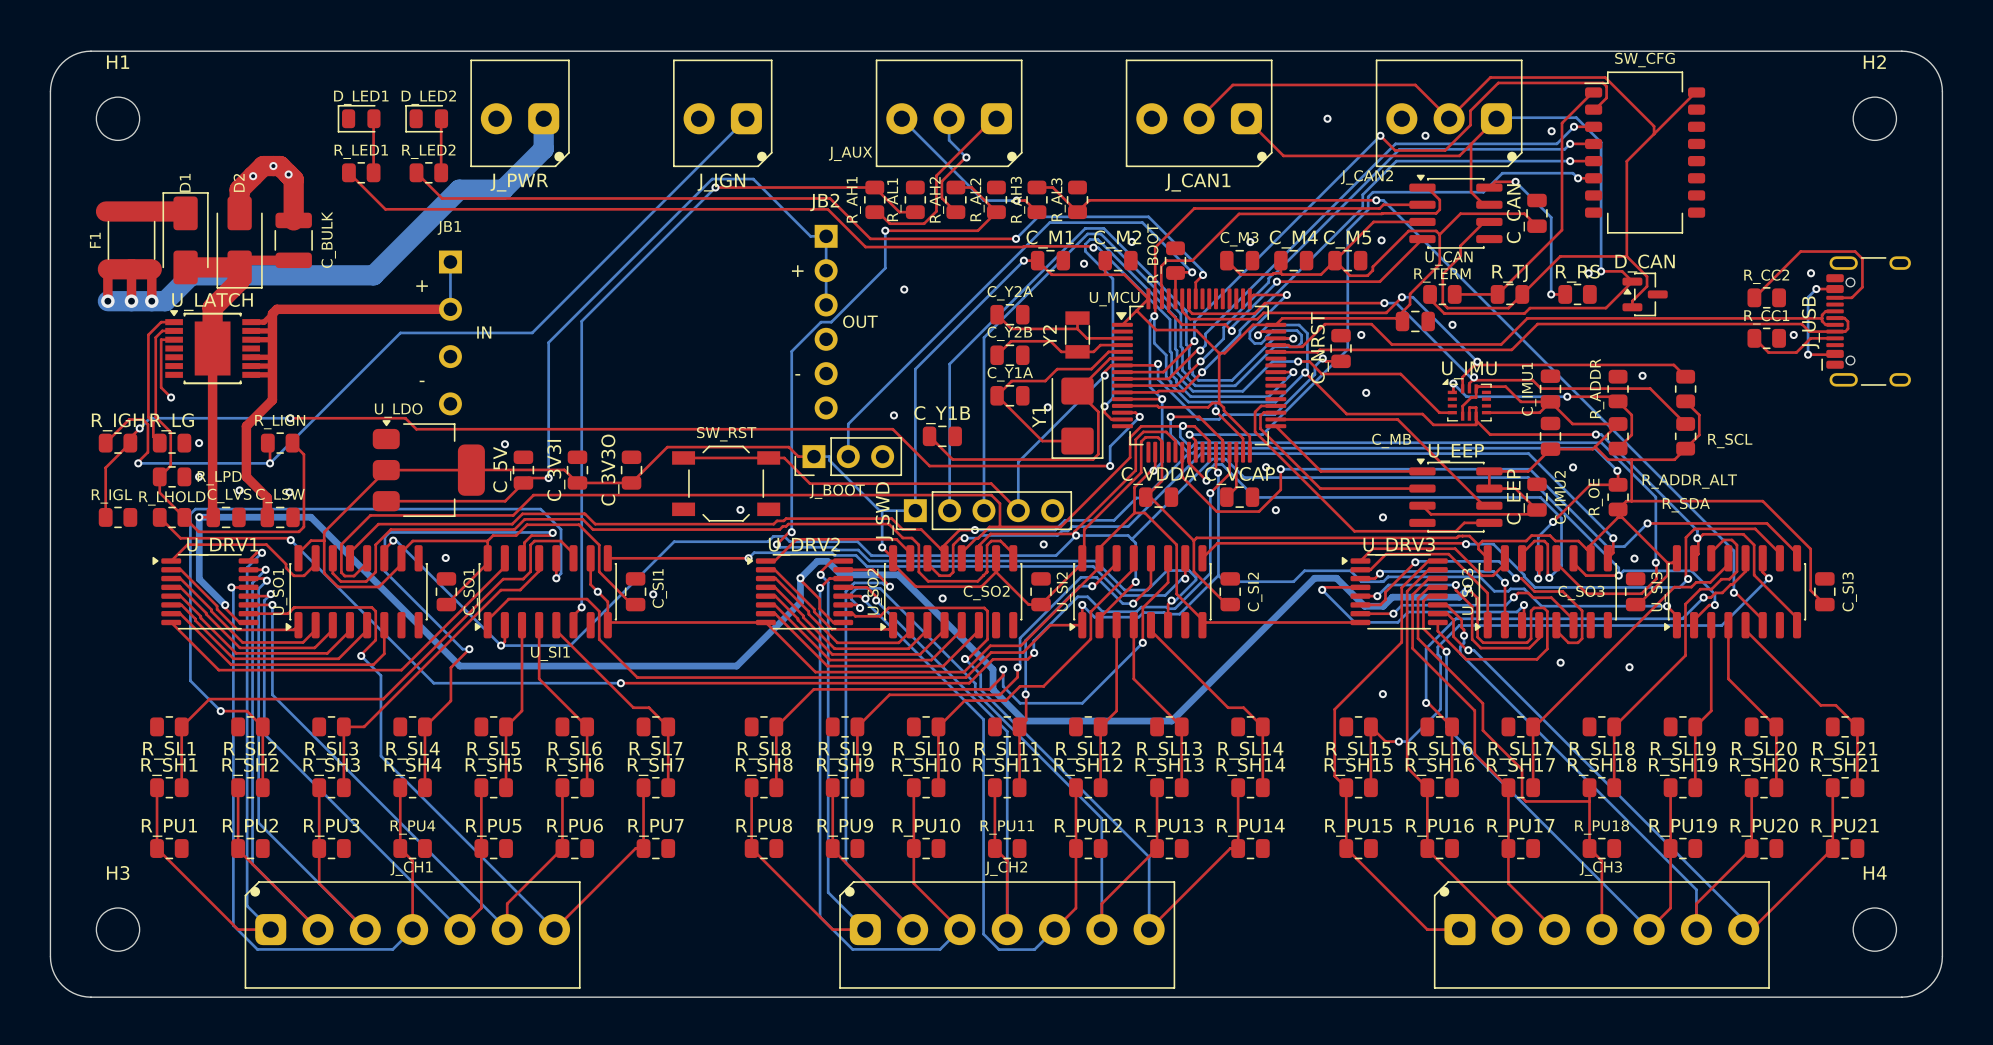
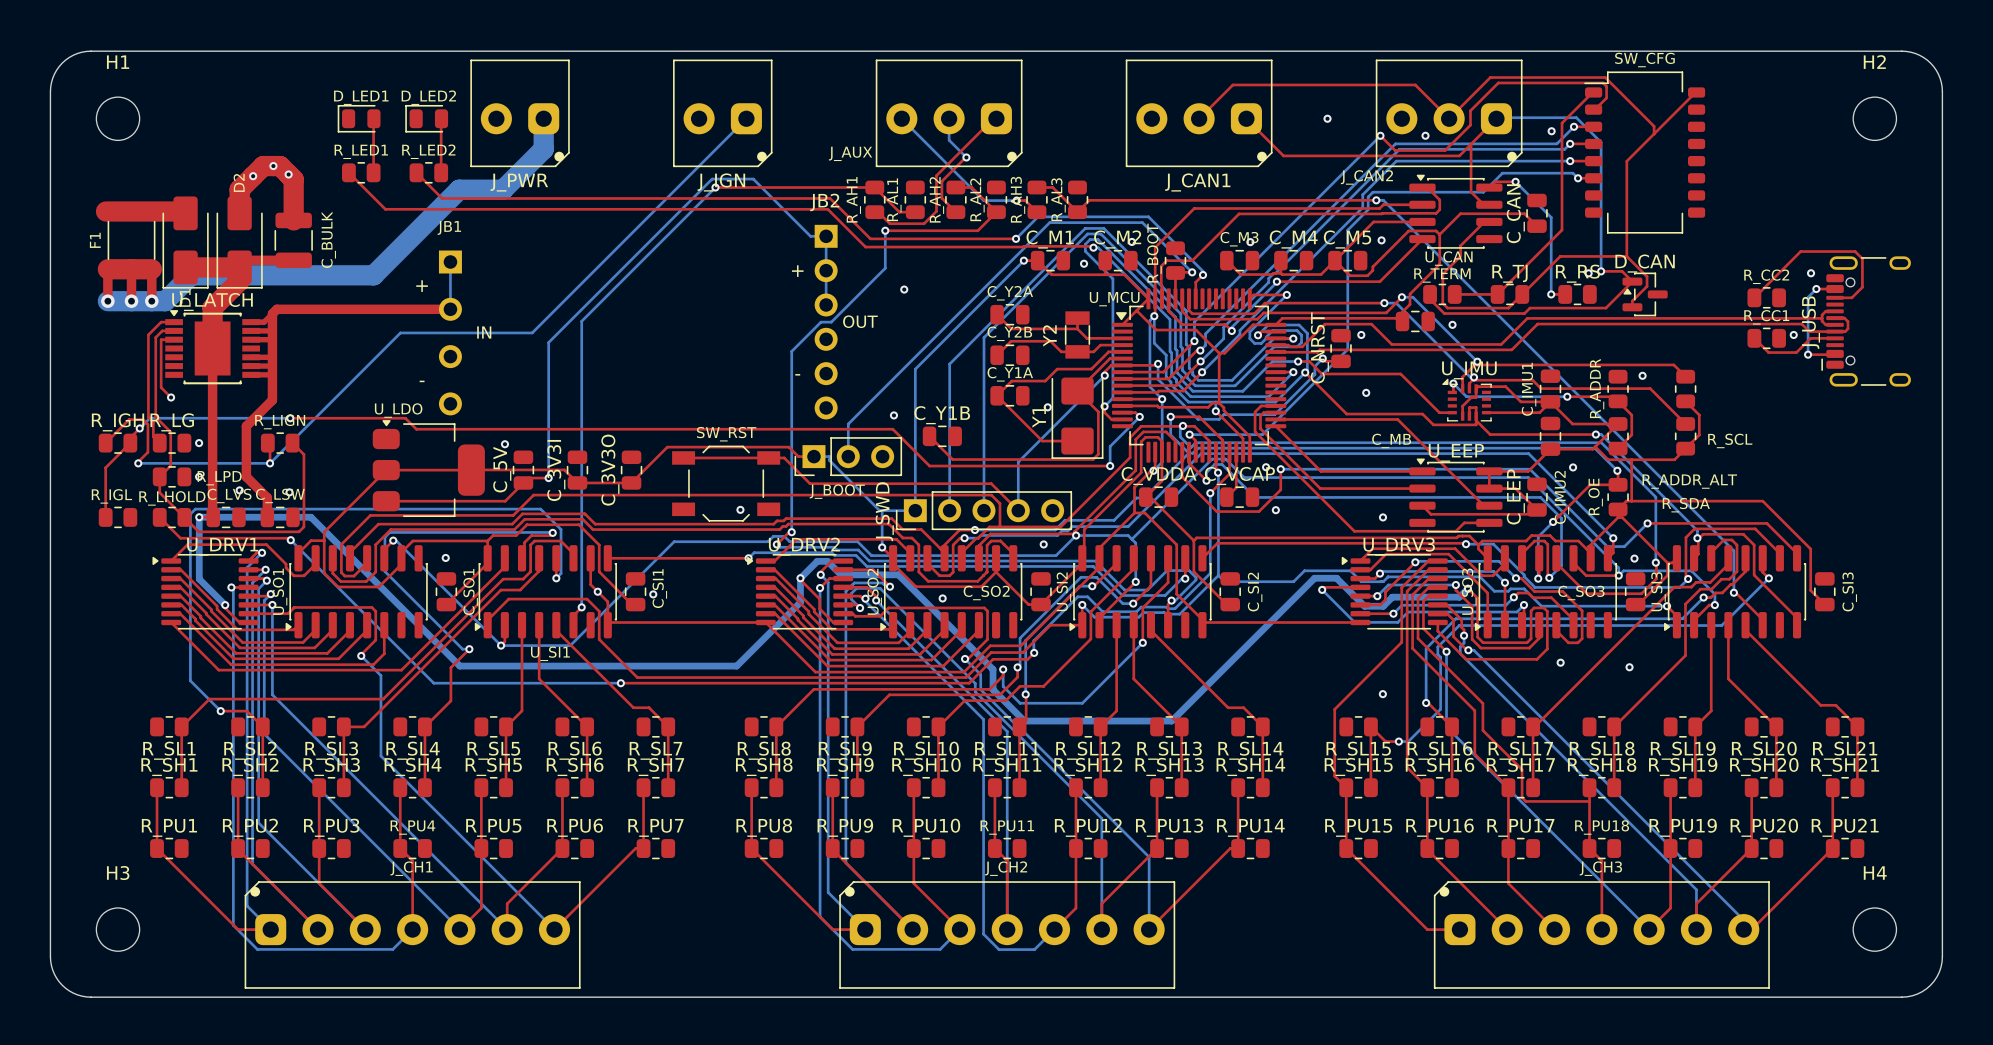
D1 rotation: 0° (185, 238) -> 180° (185, 242)

